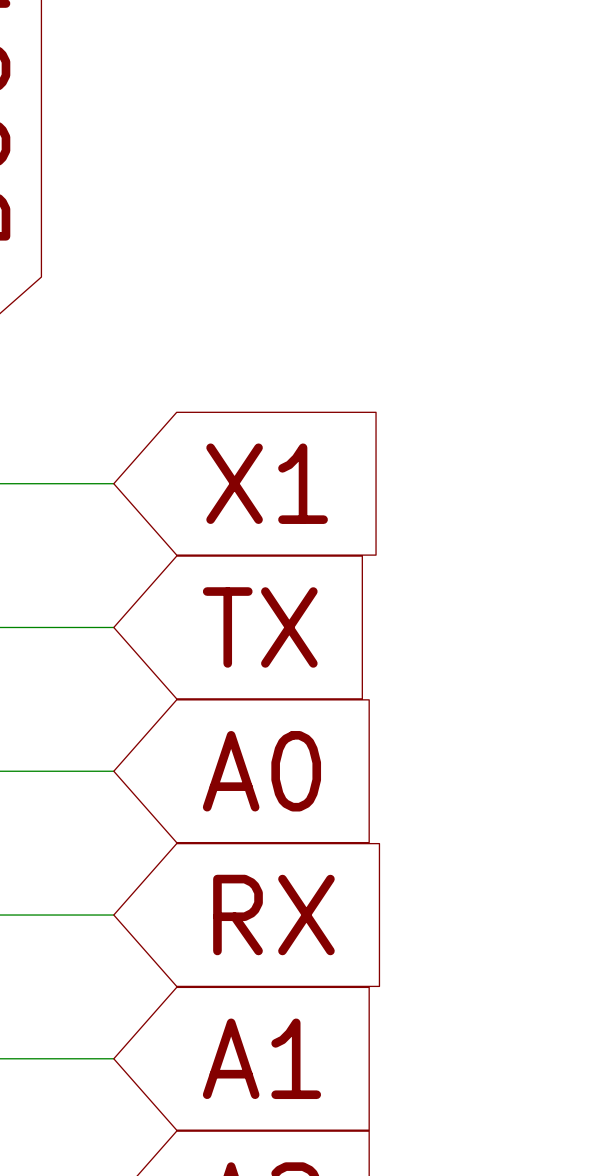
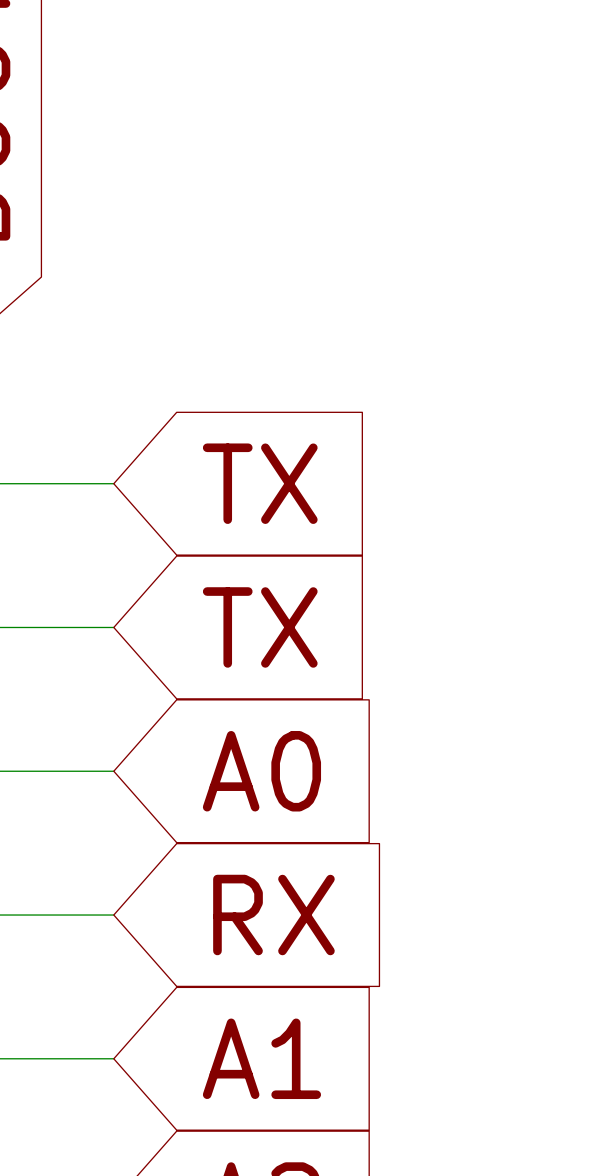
global label: X1 (267, 483) -> TX (260, 483)

